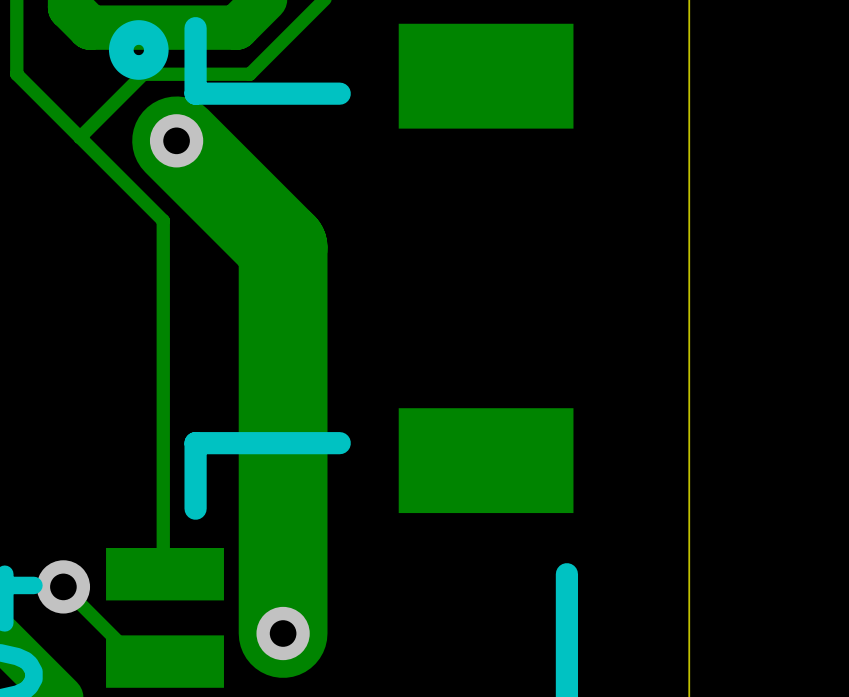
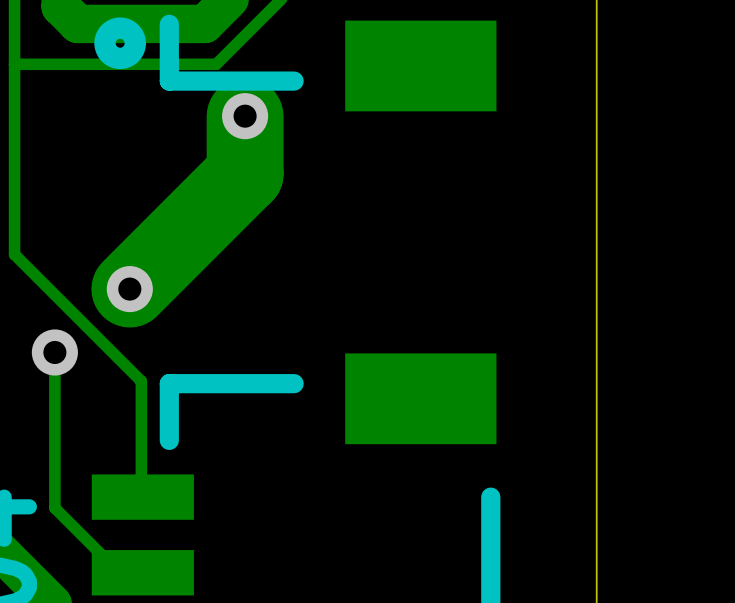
track: (16, 74) (163, 220) (163, 440) -> (124, 64) (14, 64) (14, 254) (141, 381)
track: (143, 74) (80, 137) -> none
track: none -> (245, 116) (245, 173) (129, 289)
via: none -> (245, 116)
track: (176, 140) (283, 247) (283, 633) -> none
via: (176, 140) -> none
via: none -> (129, 289)
track: none -> (54, 352) (54, 508)
via: none -> (54, 352)
via: (63, 586) -> none
via: (283, 633) -> none

